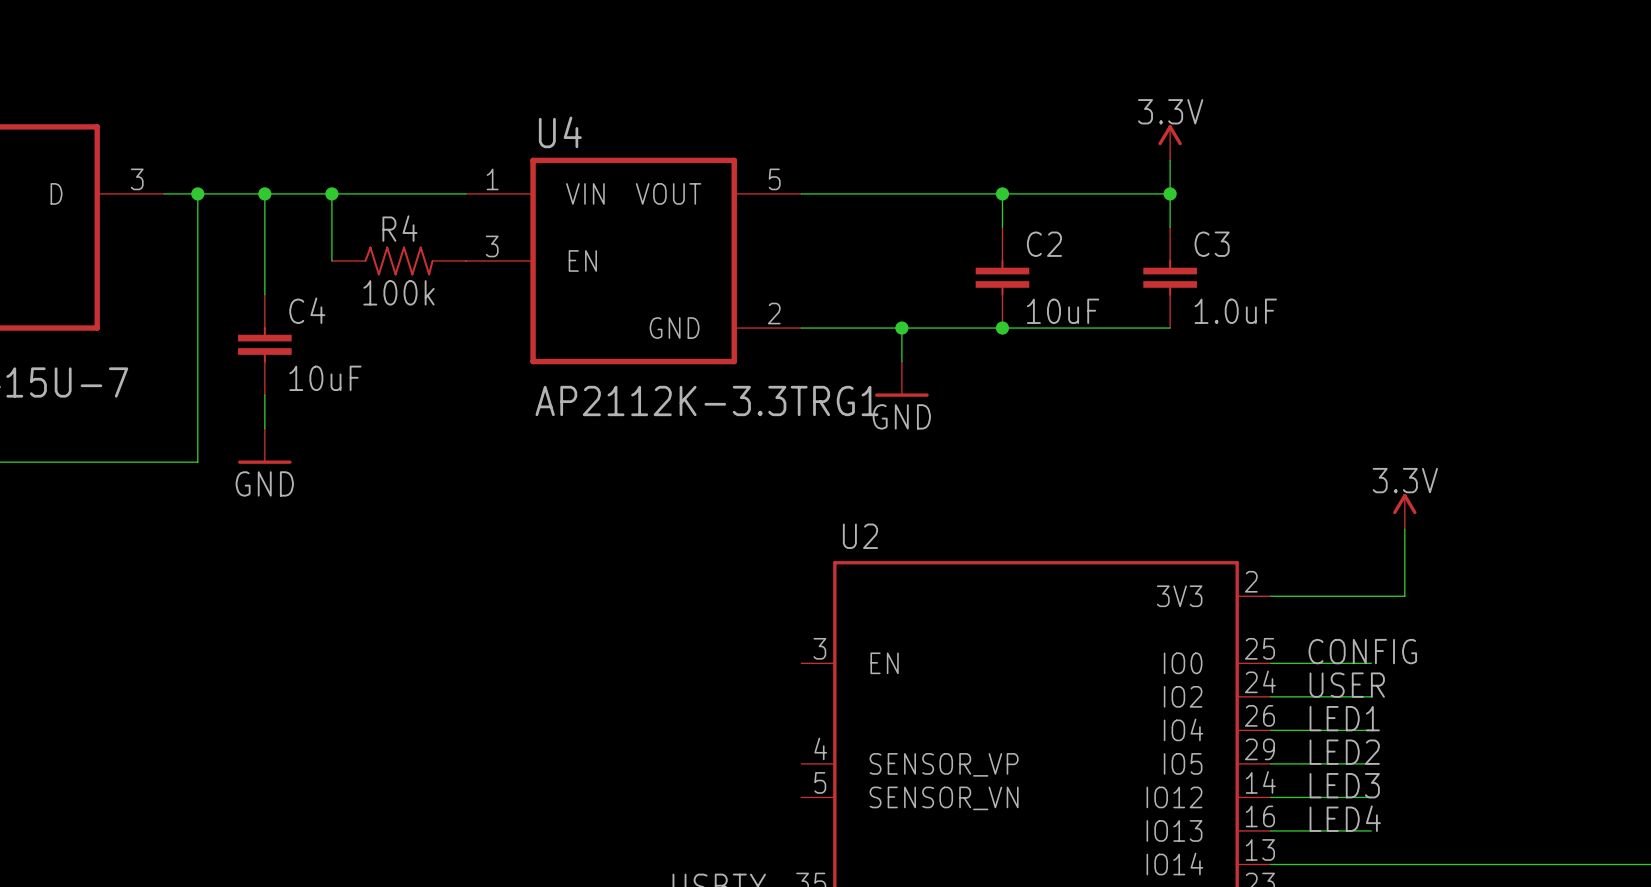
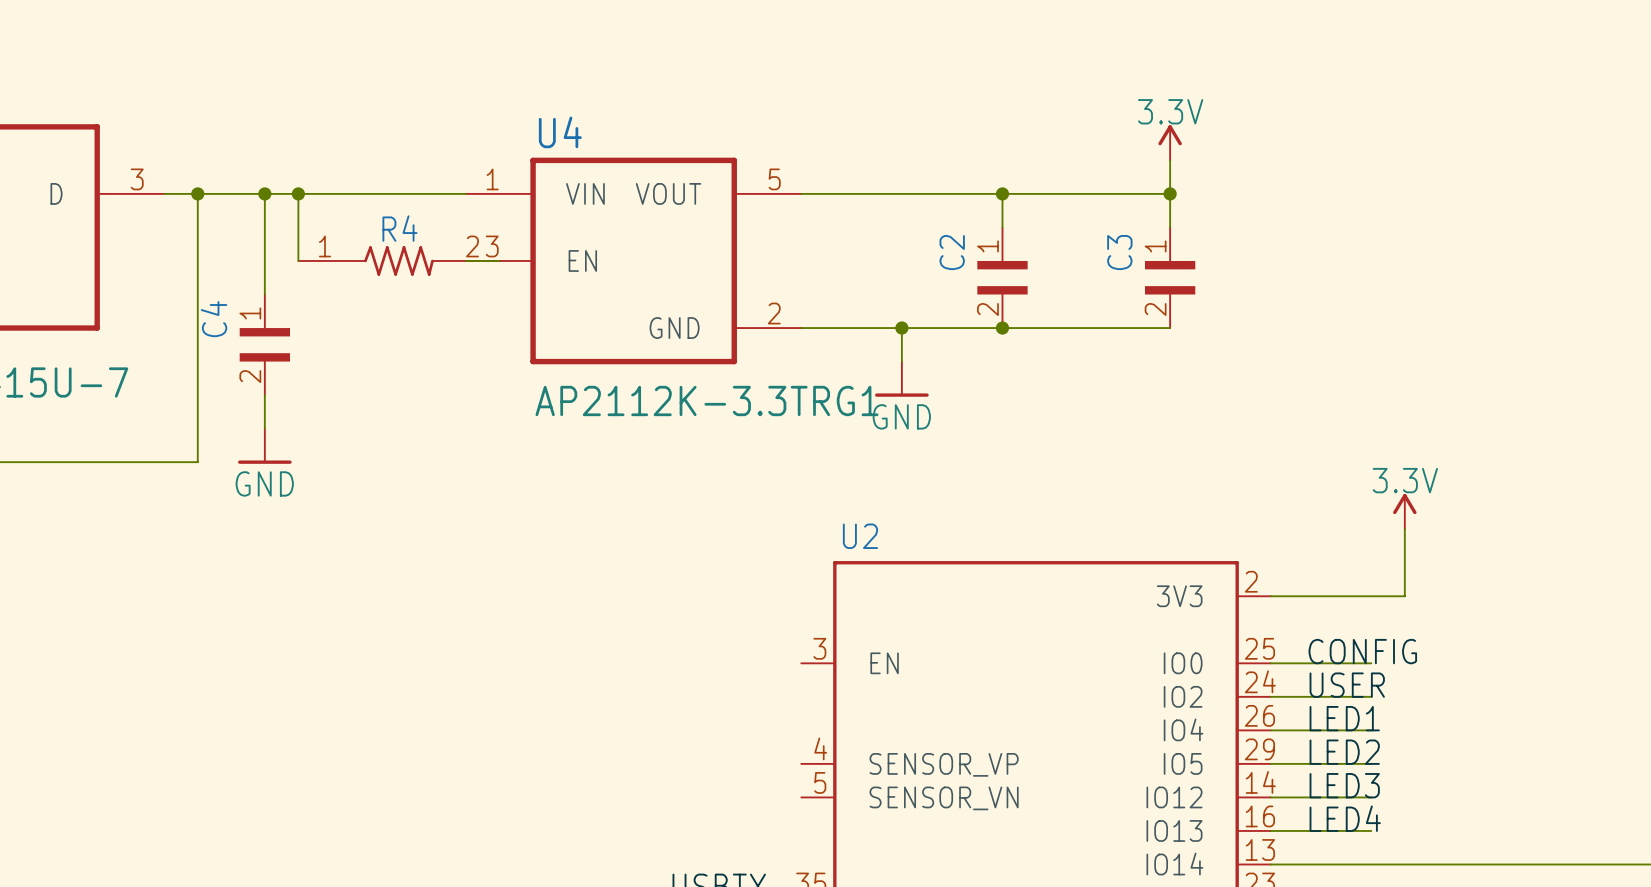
wire: (331, 193) (331, 260) -> (298, 193) (298, 260)
junction position: (331, 193) -> (298, 193)
C2 symbol: [975, 227, 1030, 329] -> [977, 227, 1028, 329]
C3 symbol: [1143, 227, 1197, 329] -> [1144, 227, 1196, 329]
C2 name position: C2 (1044, 244) -> C2 (952, 252)
C3 name position: C3 (1212, 244) -> C3 (1119, 252)
R4 symbol: [331, 246, 467, 276] -> [298, 246, 500, 276]
R4 value: 100k (398, 292) -> none
C4 symbol: [238, 294, 292, 396] -> [239, 294, 291, 396]
C4 name position: C4 (307, 310) -> C4 (214, 319)
C2 value: 10uF (1063, 311) -> none
C3 value: 1.0uF (1235, 311) -> none
C4 value: 10uF (325, 378) -> none

